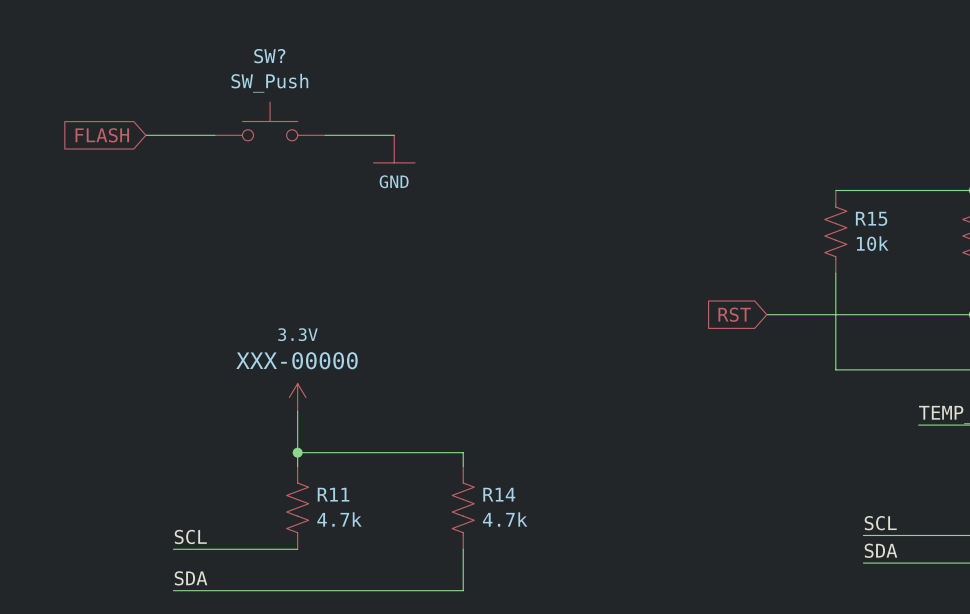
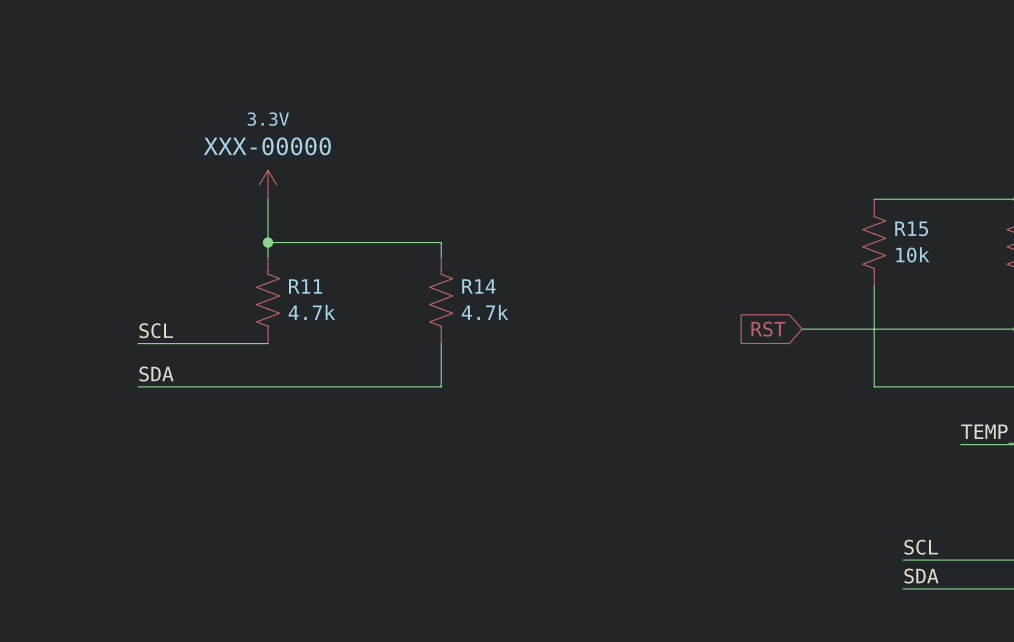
SW?: SW_Push (270, 121) -> none
global label: FLASH (102, 135) -> none
wire: (145, 135) (214, 135) -> none
wire: (325, 135) (394, 135) -> none
power symbol: GND (394, 149) -> none
junction: none -> (268, 242)
label: none -> SCL (156, 330)
label: none -> SDA (156, 374)
power symbol position: 3.3V (297, 397) -> 3.3V (268, 184)
wire: (297, 411) (297, 466) -> (268, 199) (268, 256)
wire: (297, 452) (463, 452) (463, 466) -> (268, 242) (441, 242) (441, 256)
junction: (297, 452) -> none
R11 position: (297, 507) -> (268, 300)
R14 position: (463, 507) -> (441, 300)
label: SCL (190, 536) -> none
wire: (173, 549) (297, 549) -> (138, 343) (268, 343)
wire: (463, 549) (463, 590) (173, 590) -> (441, 343) (441, 386) (138, 386)
label: SDA (191, 578) -> none

